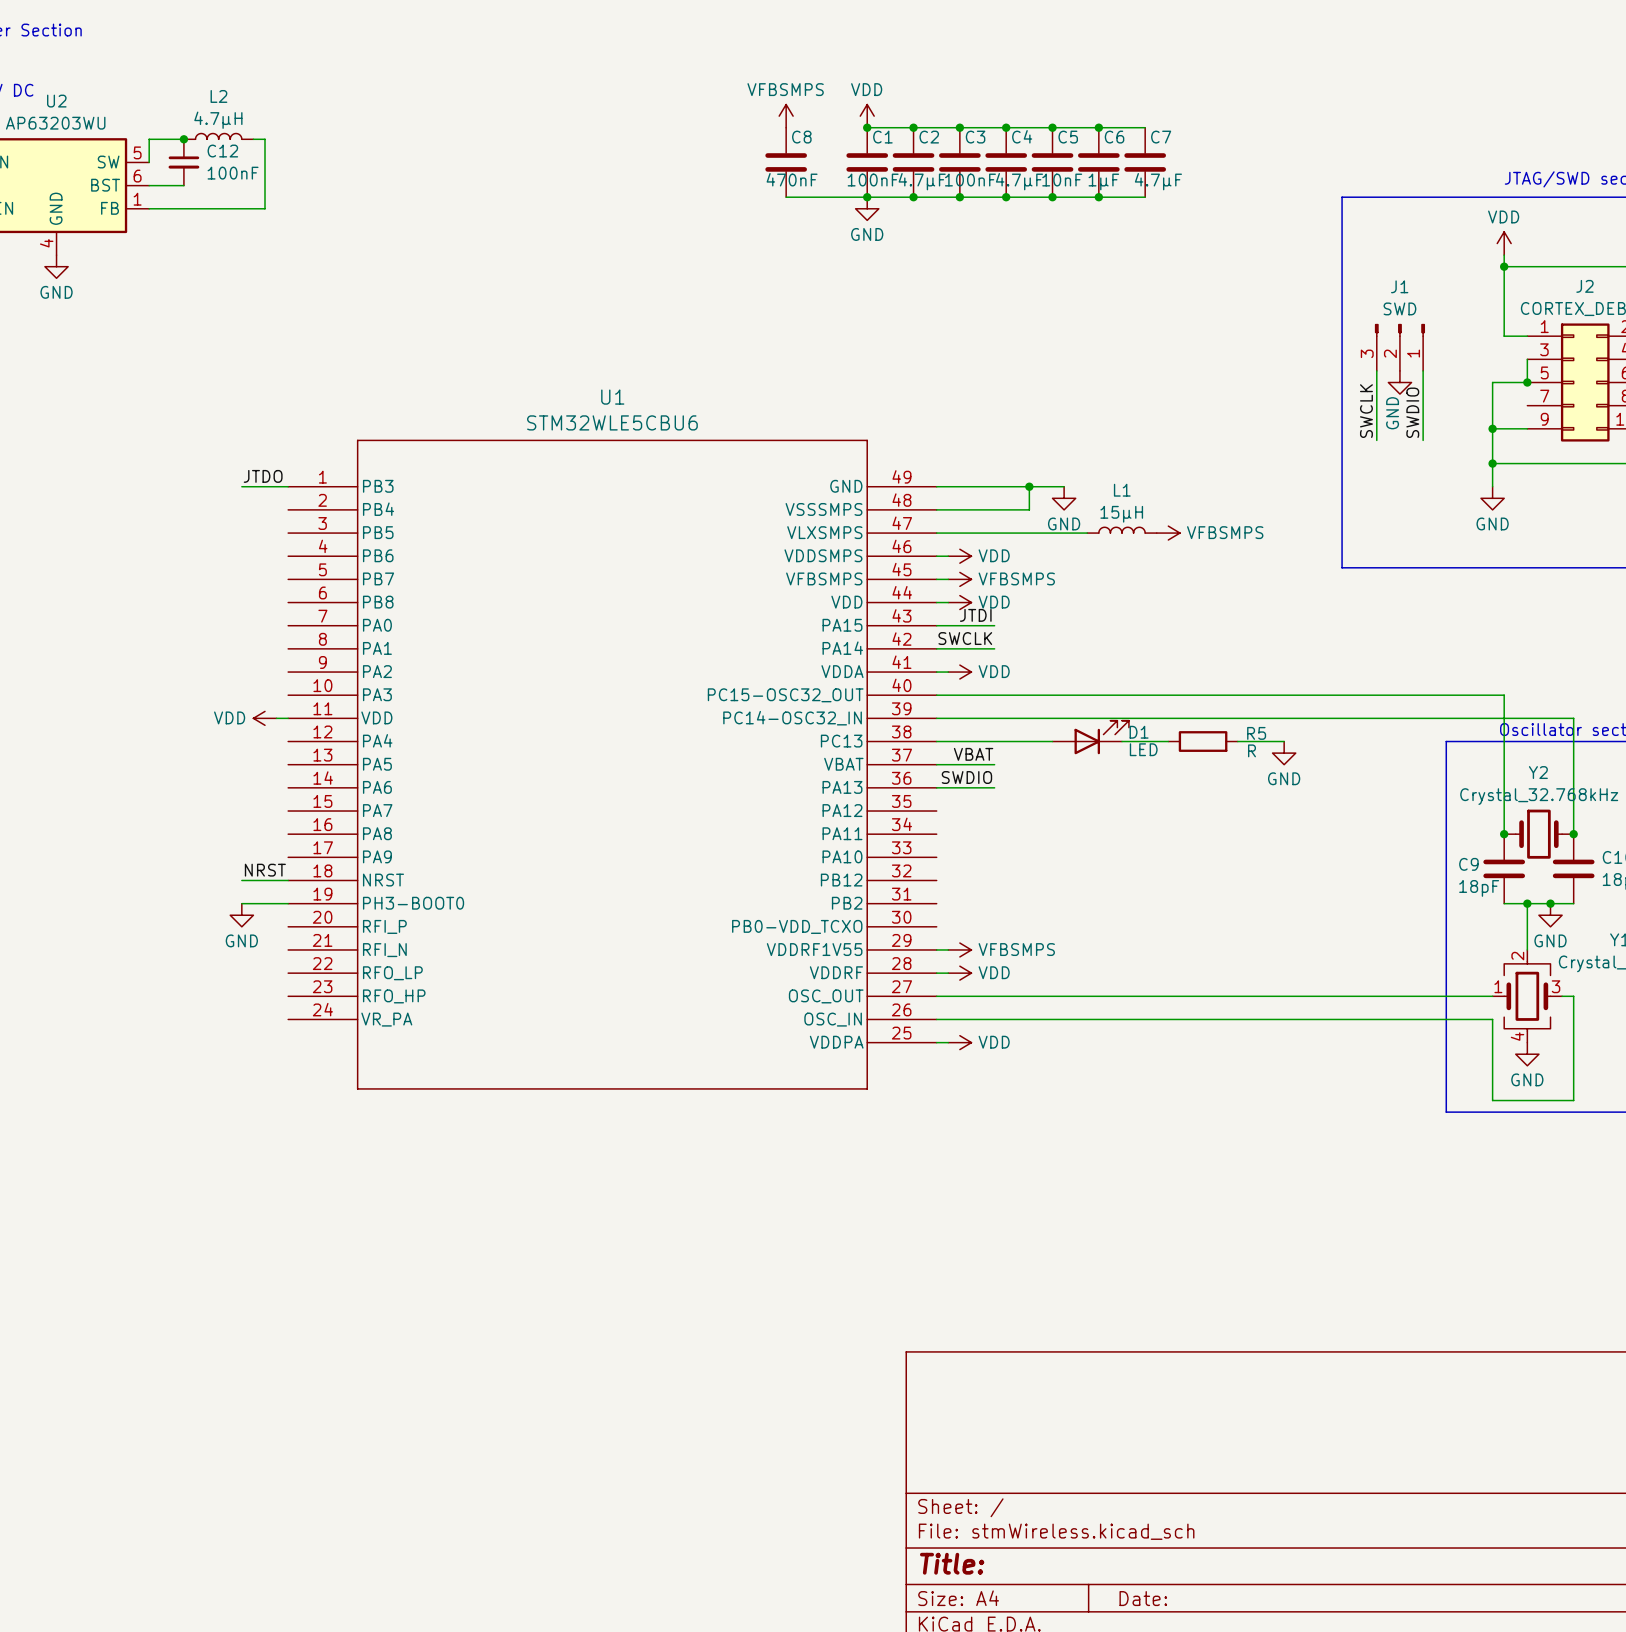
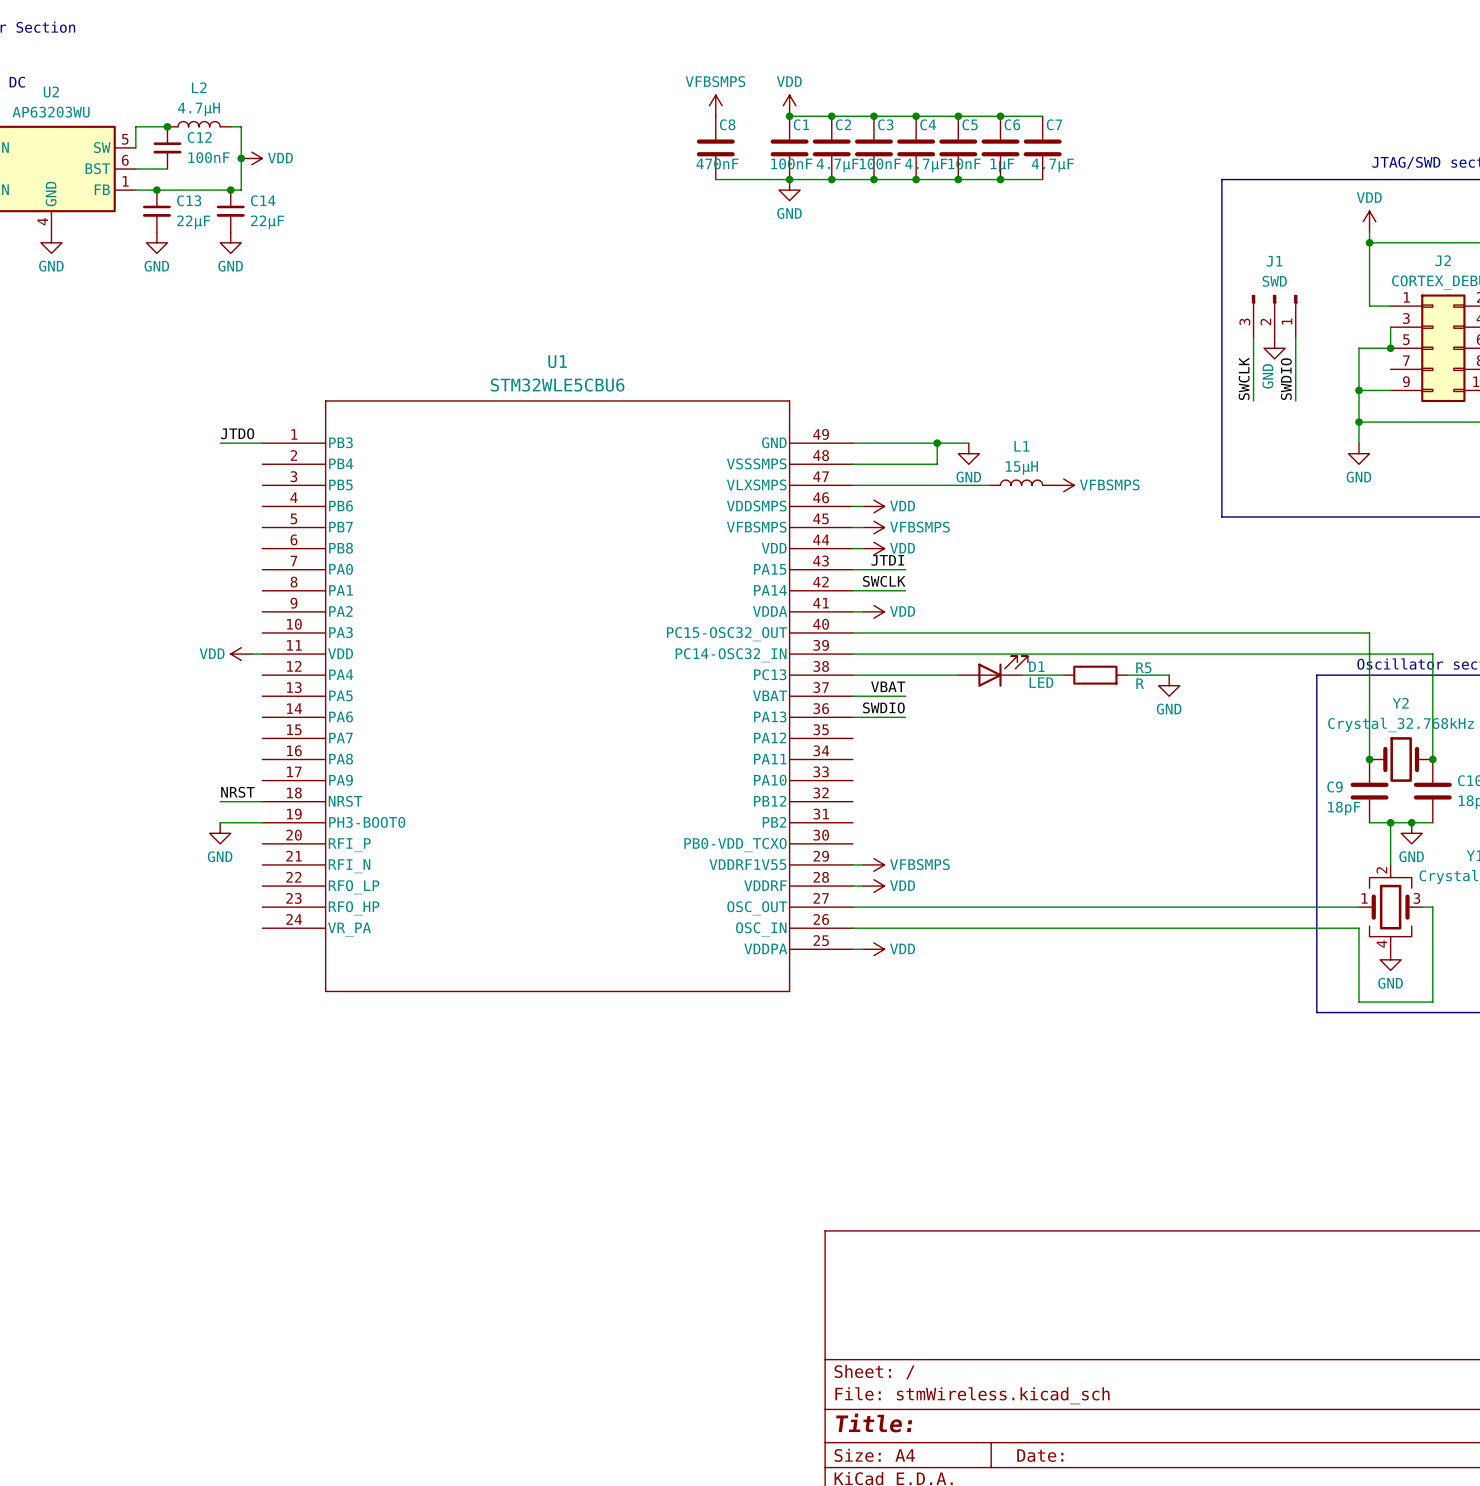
junction: none -> (241, 158)
power symbol: none -> VDD (251, 158)
junction: none -> (156, 190)
junction: none -> (230, 190)
C13: none -> 22µF (156, 211)
C14: none -> 22µF (230, 211)
power symbol: none -> GND (156, 242)
power symbol: none -> GND (230, 242)

